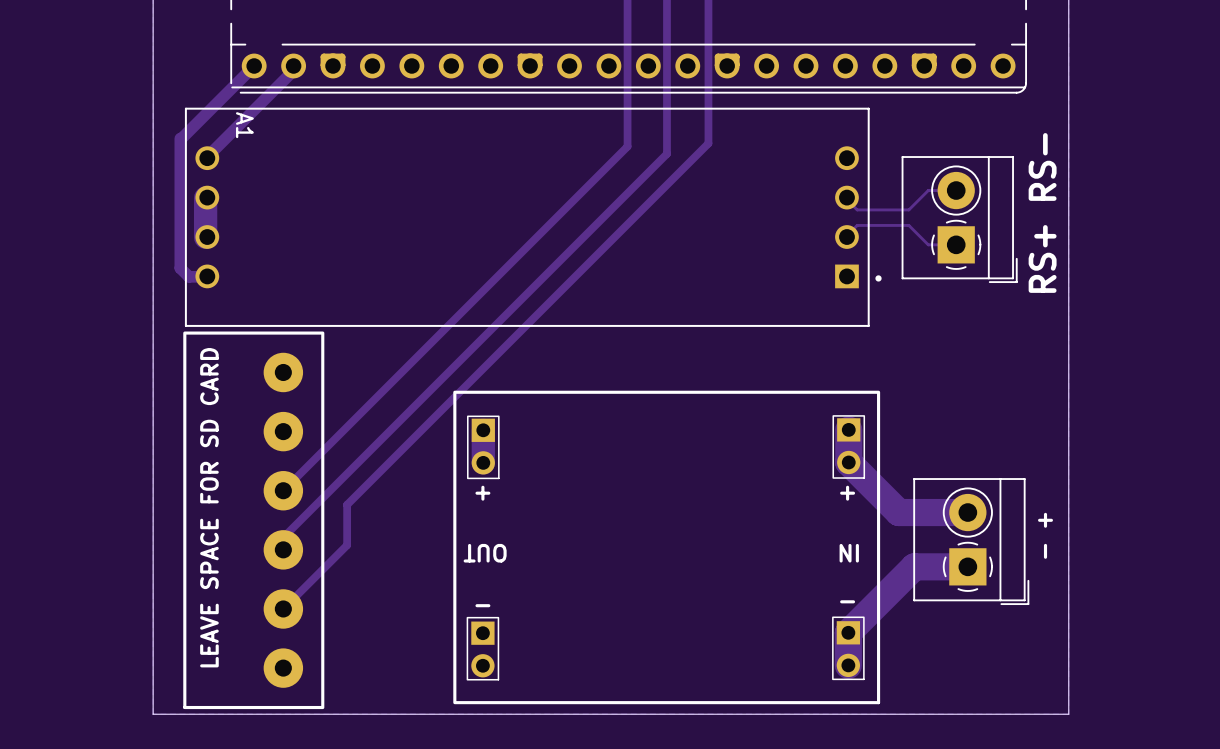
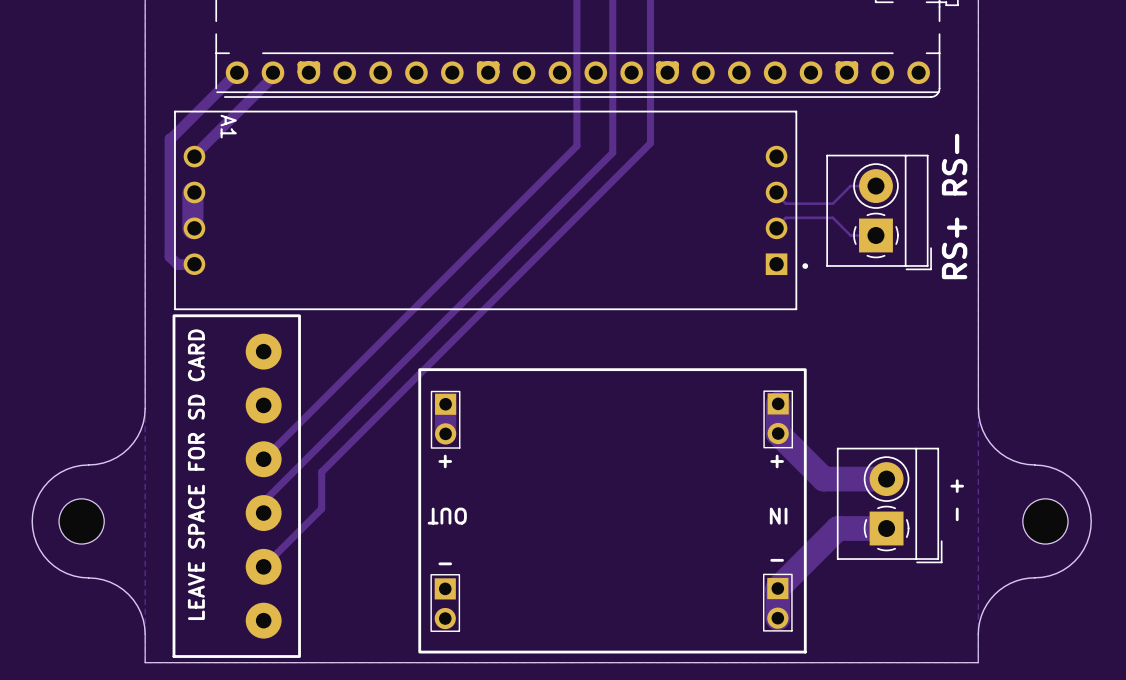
board edge: (153, 434) (153, 683) -> (145, 408) (140, 430) (133, 442) (123, 453) (103, 463) (67, 469) (48, 481) (36, 499) (32, 521) (36, 543) (48, 561) (67, 573) (103, 579) (123, 589) (137, 606) (143, 619) (145, 634)
board edge: (1068, 434) (1068, 714) -> (1034, 465) (1049, 466) (1063, 472) (1079, 487) (1089, 506) (1091, 521) (1089, 536) (1079, 555) (1063, 570) (1049, 575) (1016, 581) (999, 590) (990, 599) (979, 621) (978, 662)
board edge: none -> (978, 408) (982, 430) (994, 448) (1013, 460) (1034, 464)
part: none -> (81, 521)
part: none -> (1045, 521)

